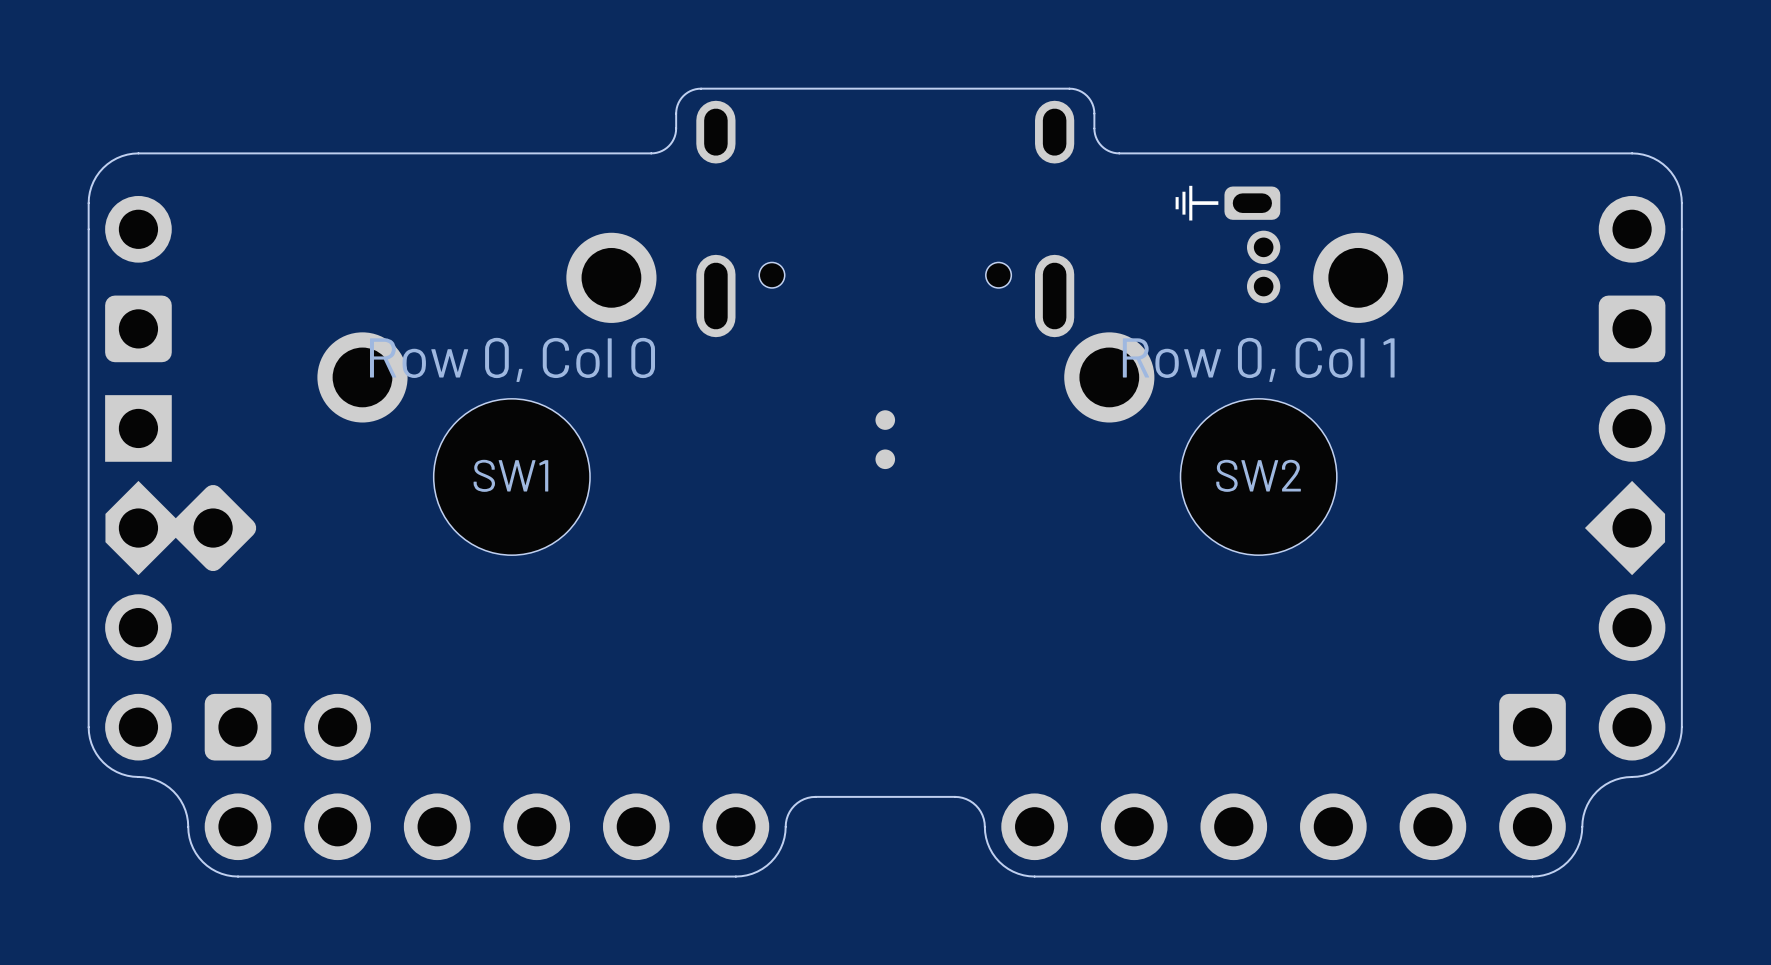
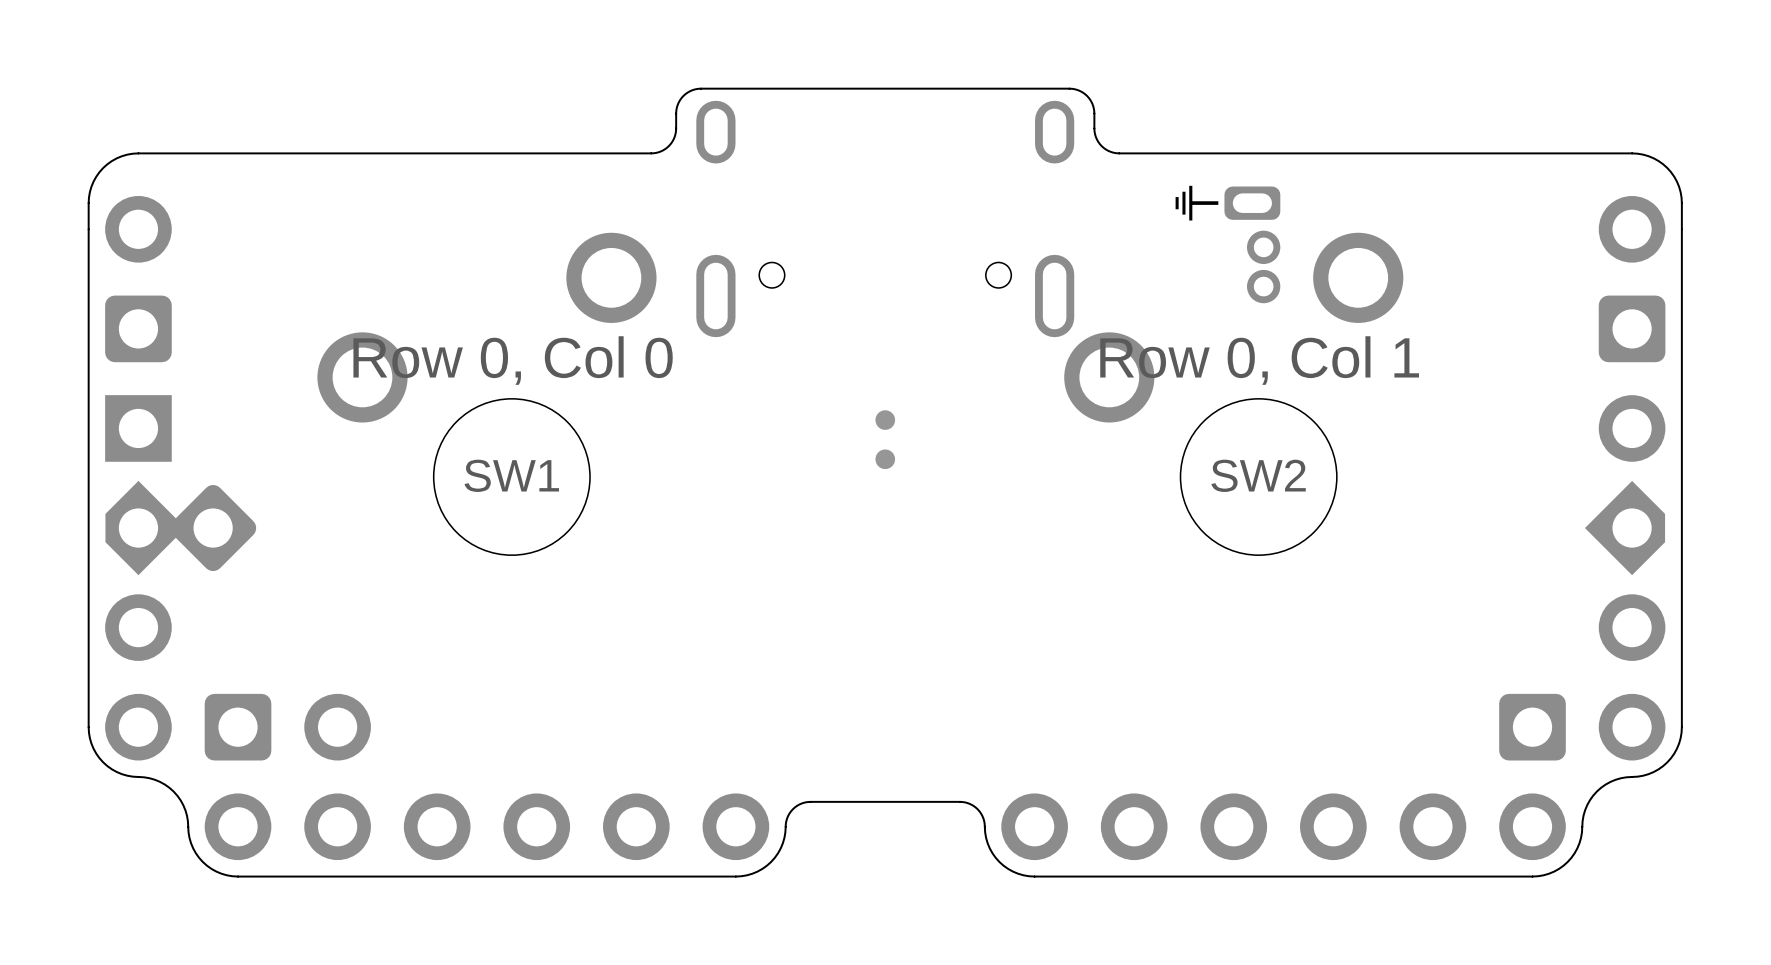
part footprint: [87, 195, 1683, 878] -> [87, 195, 1683, 878]

